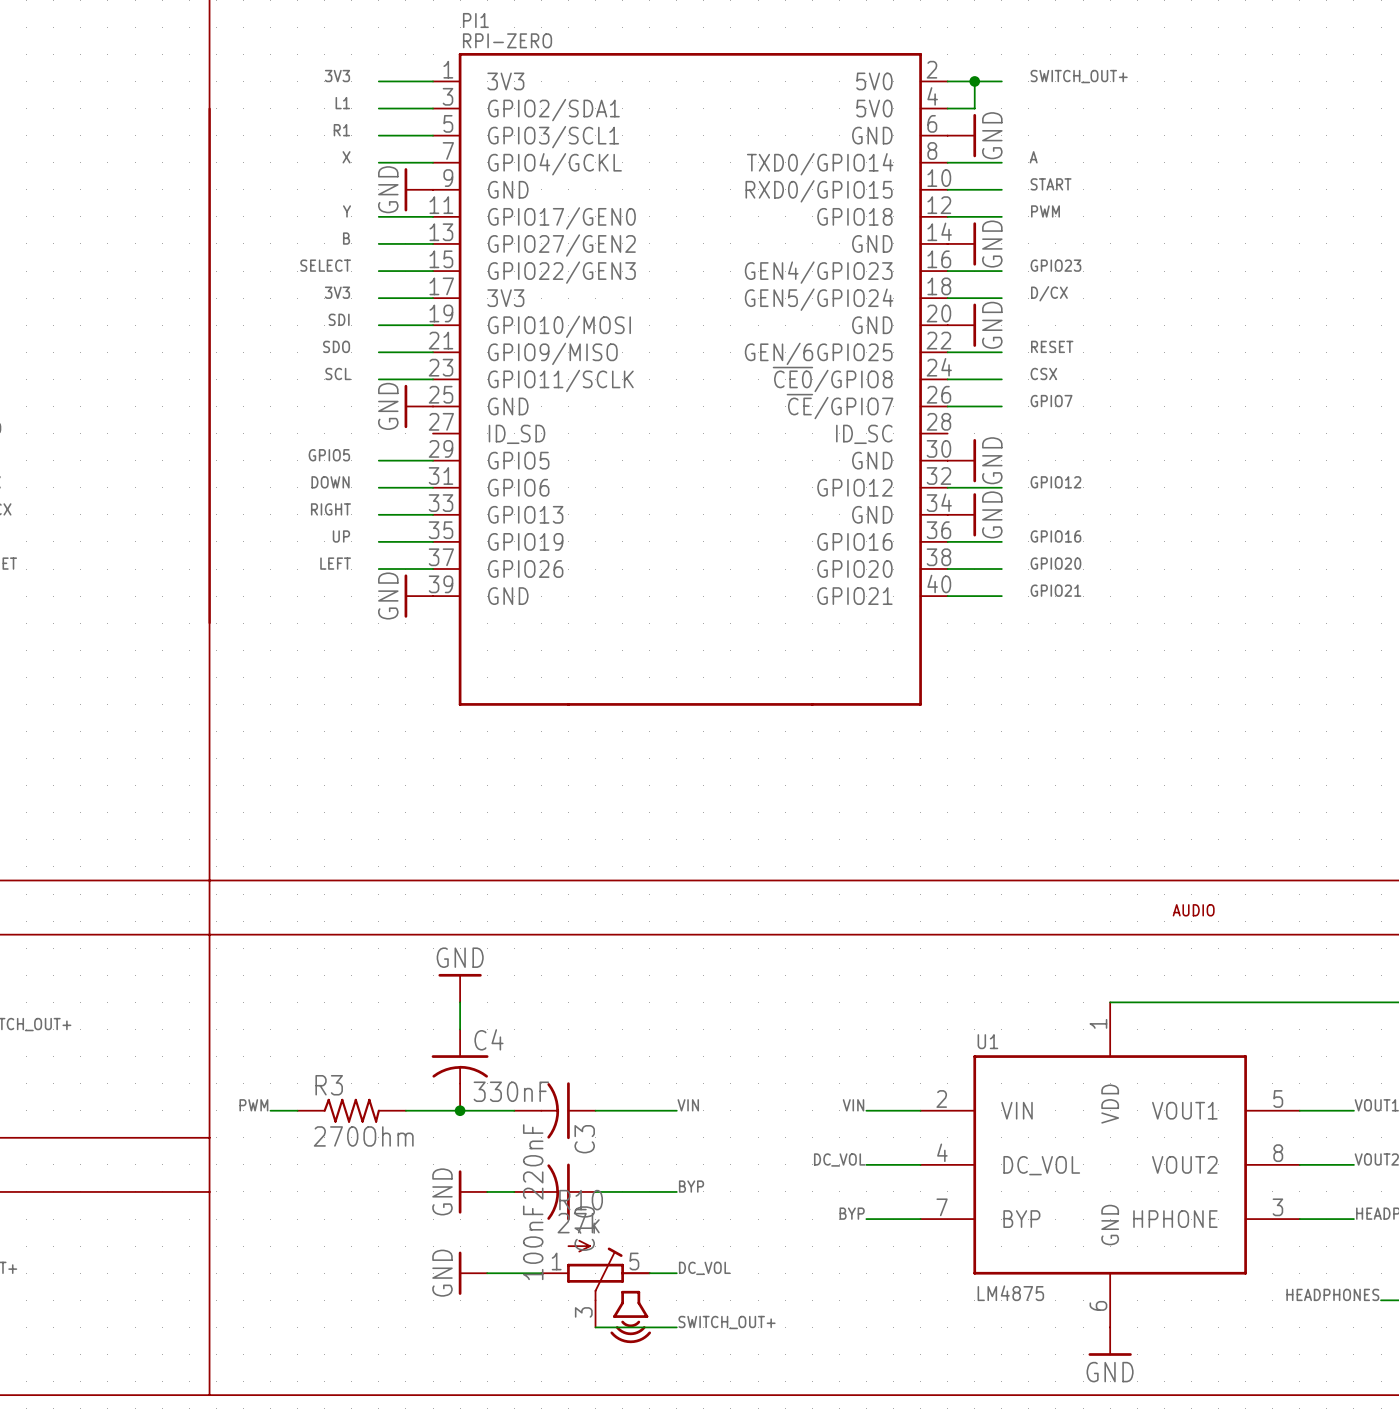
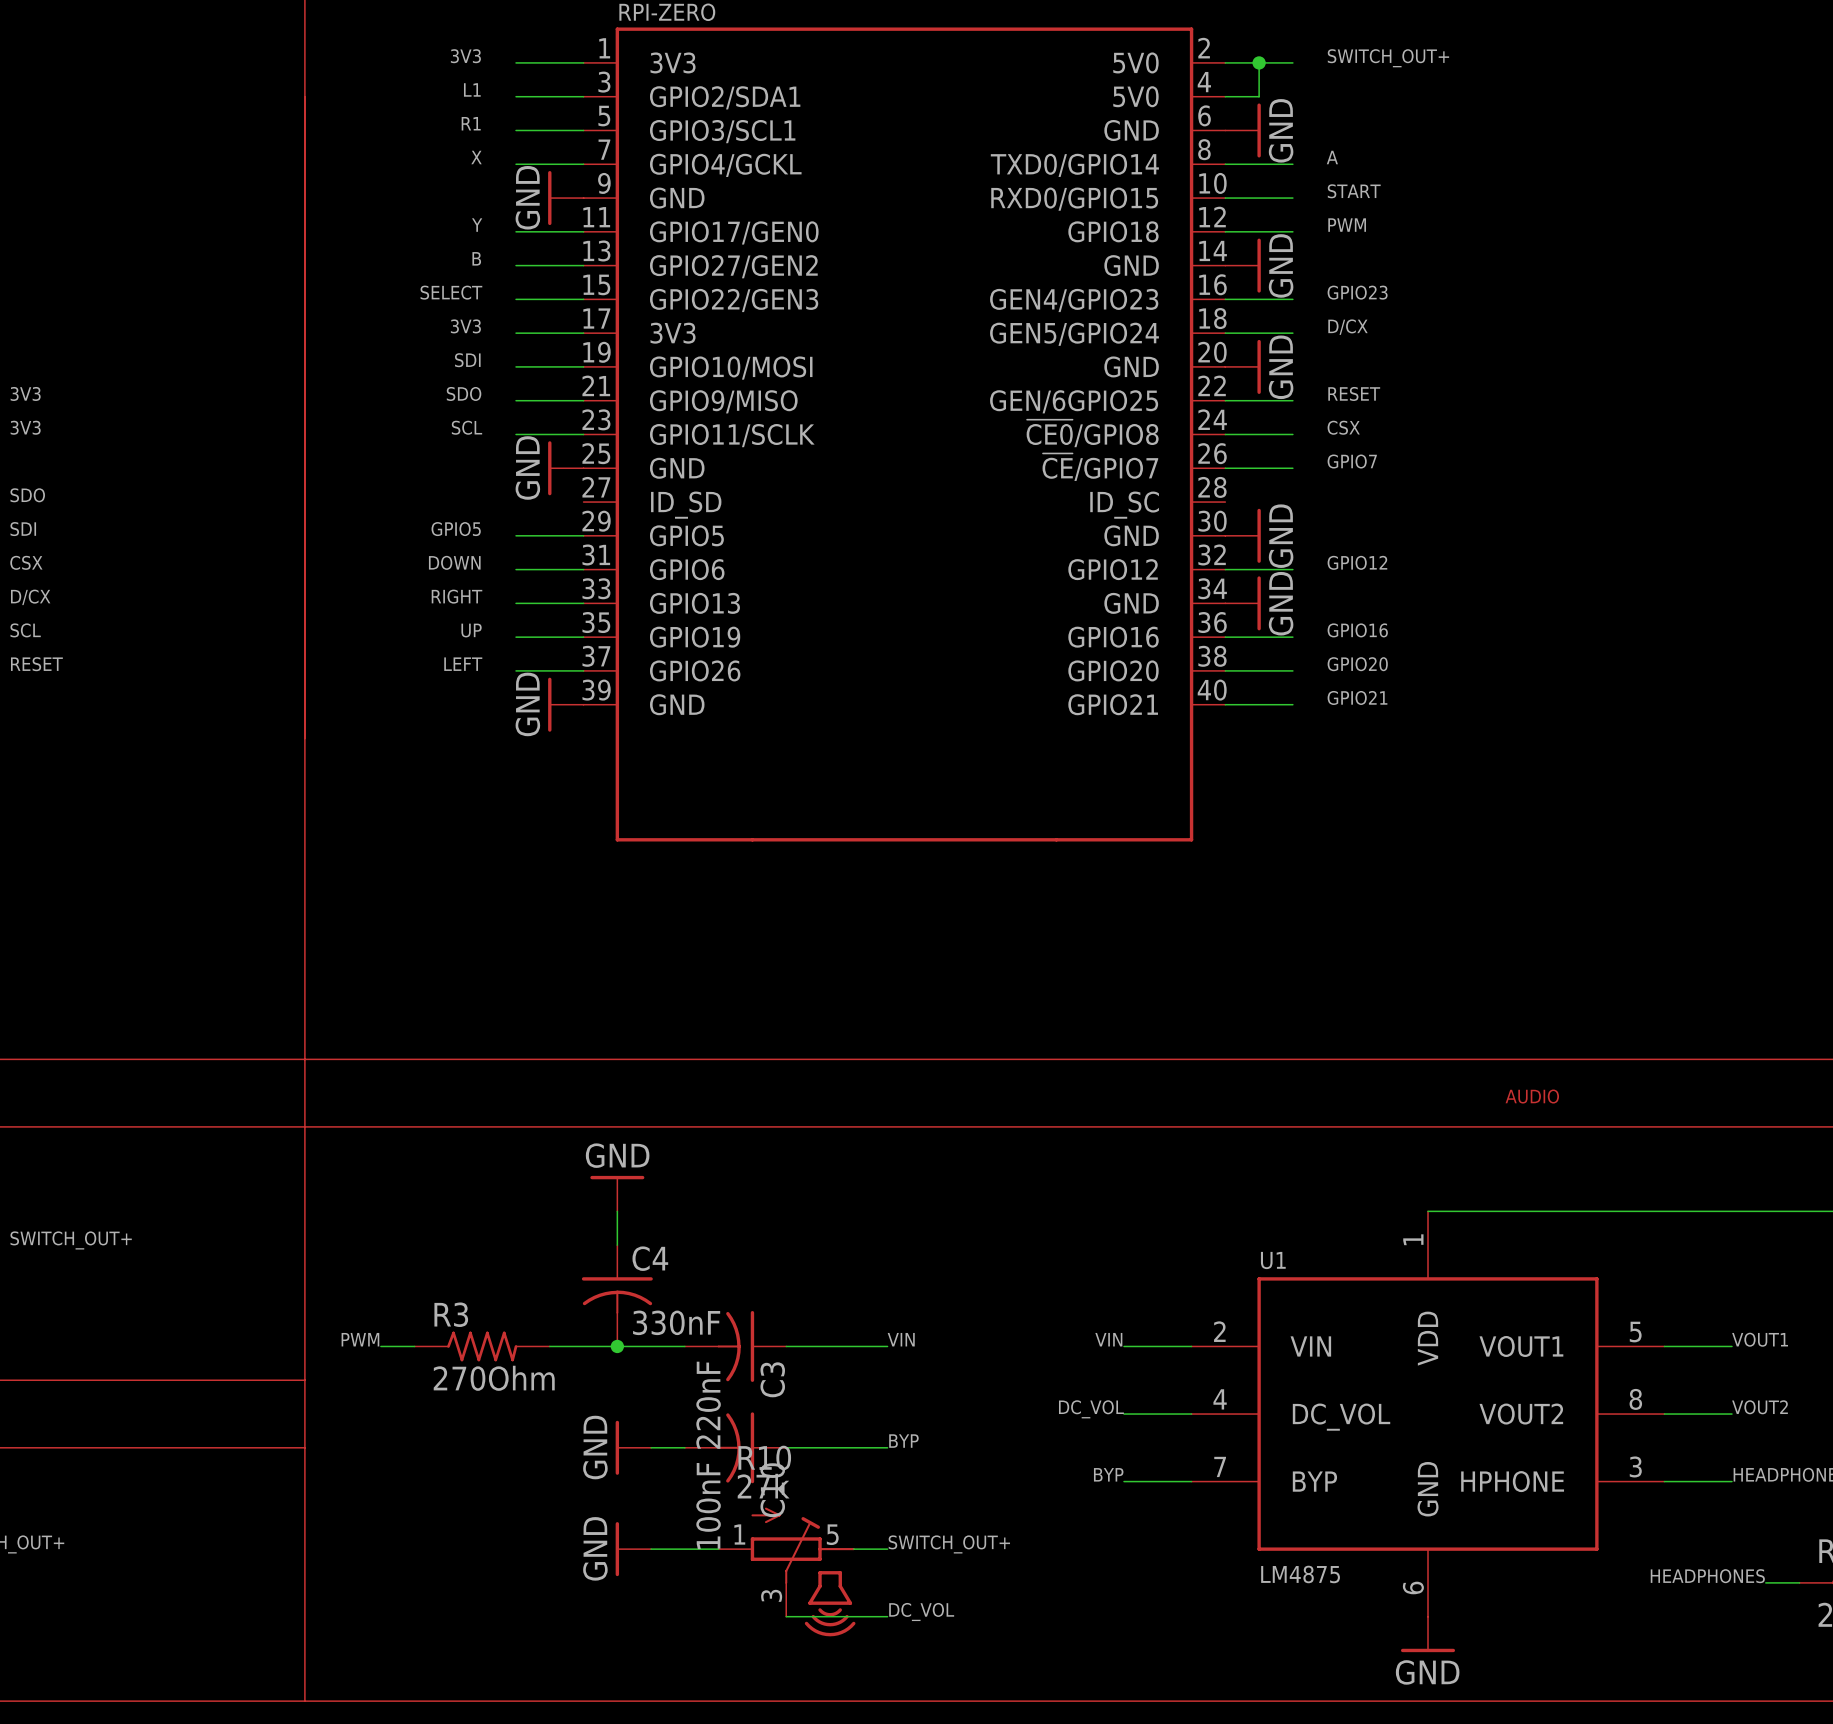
label: DC_VOL (704, 1268) -> SWITCH_OUT+ (949, 1544)
label: SWITCH_OUT+ (727, 1322) -> DC_VOL (921, 1611)

